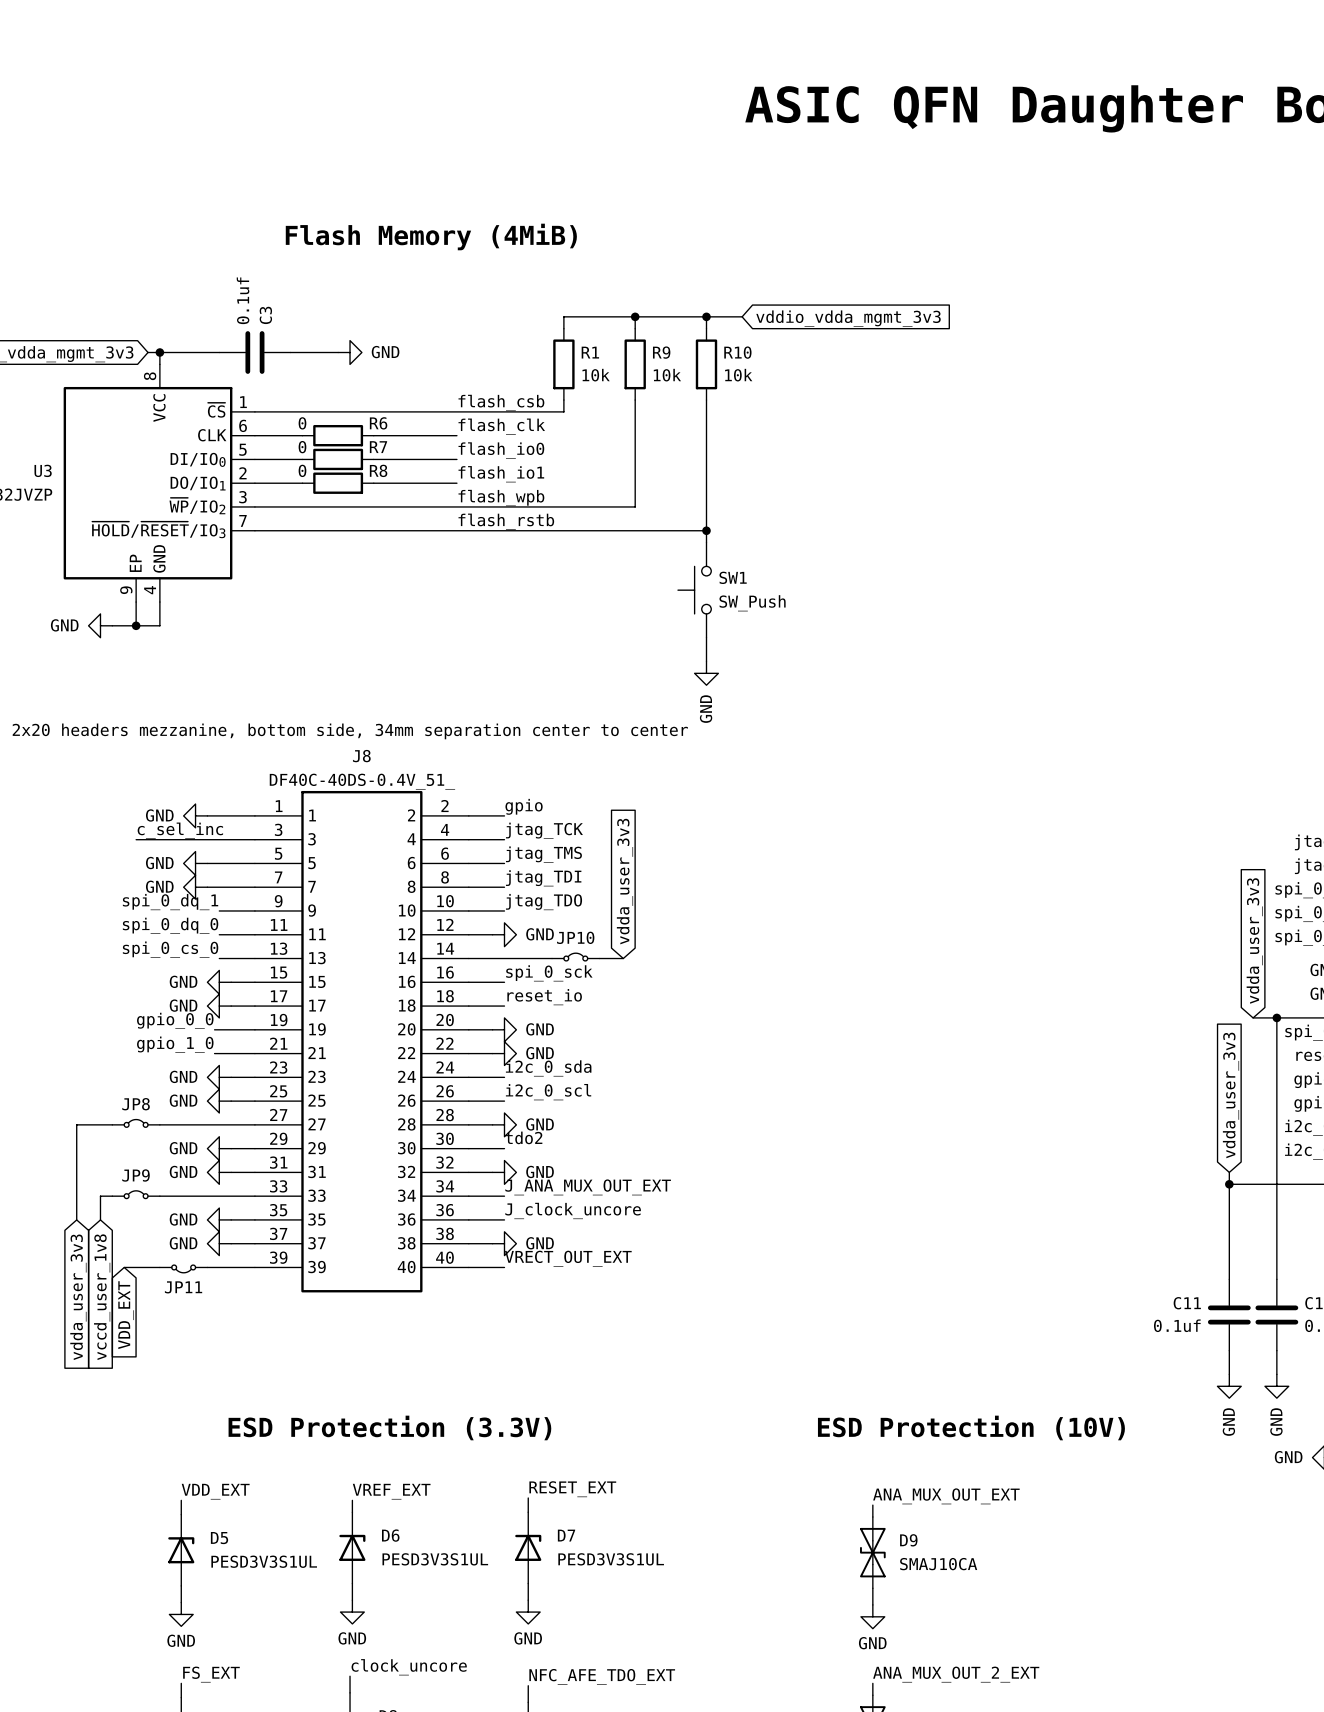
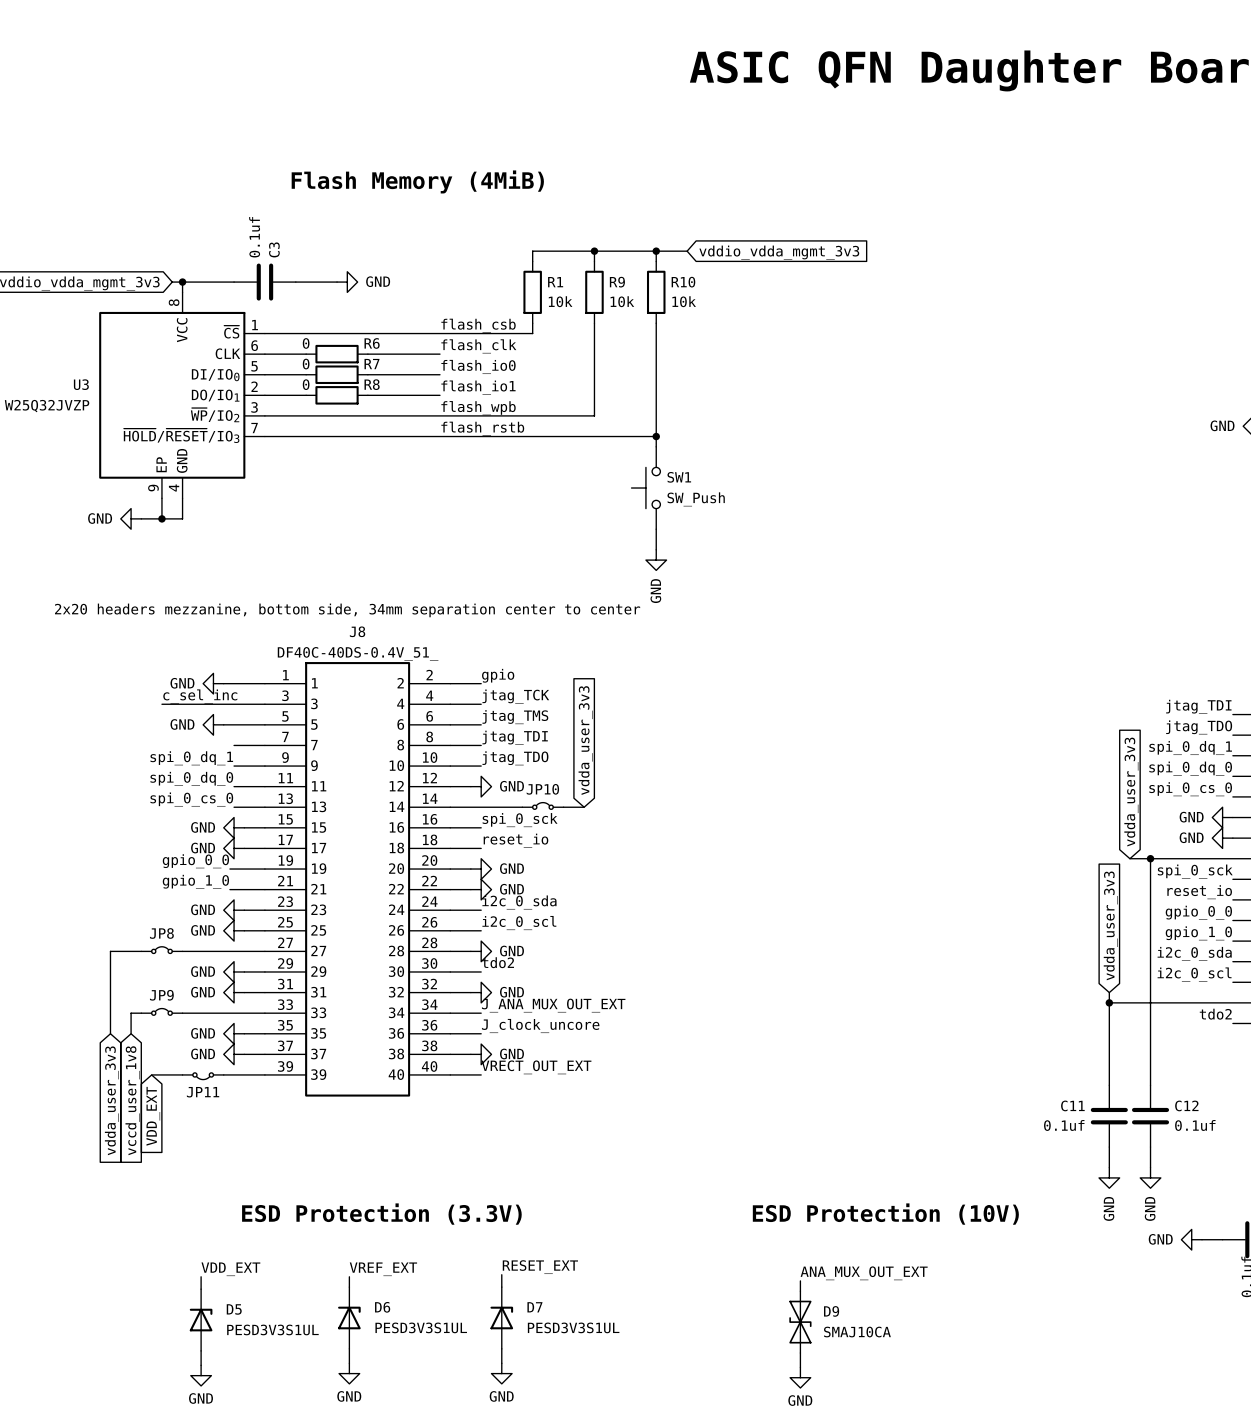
power symbol: GND (195, 887) -> none
wire: (207, 887) (219, 887) -> none

